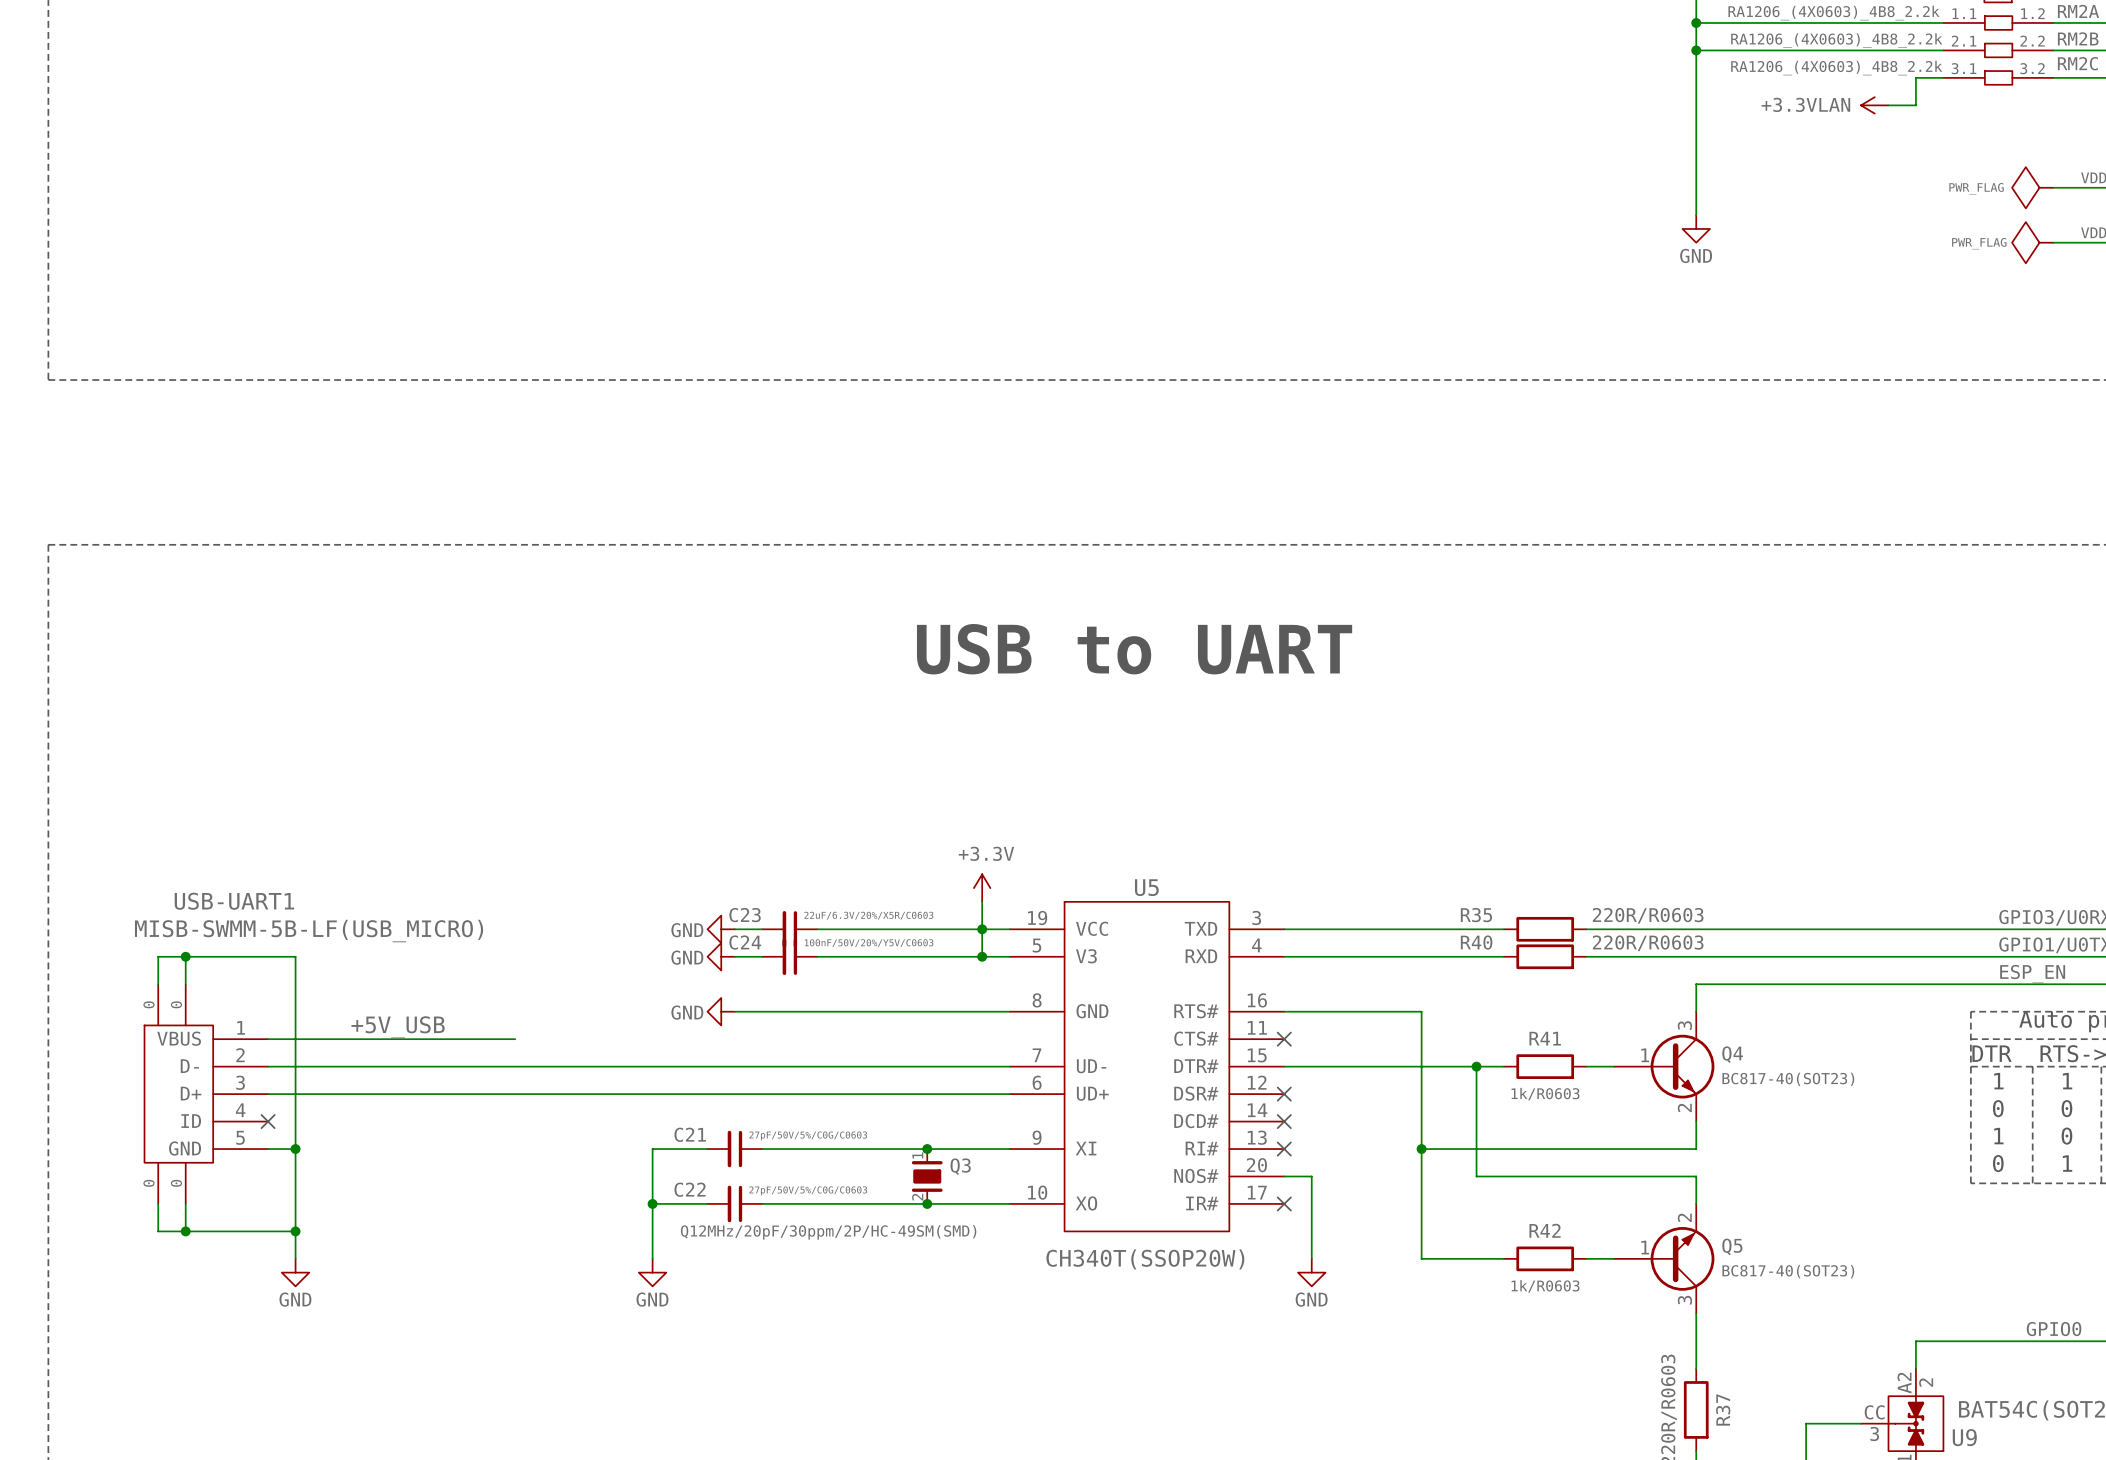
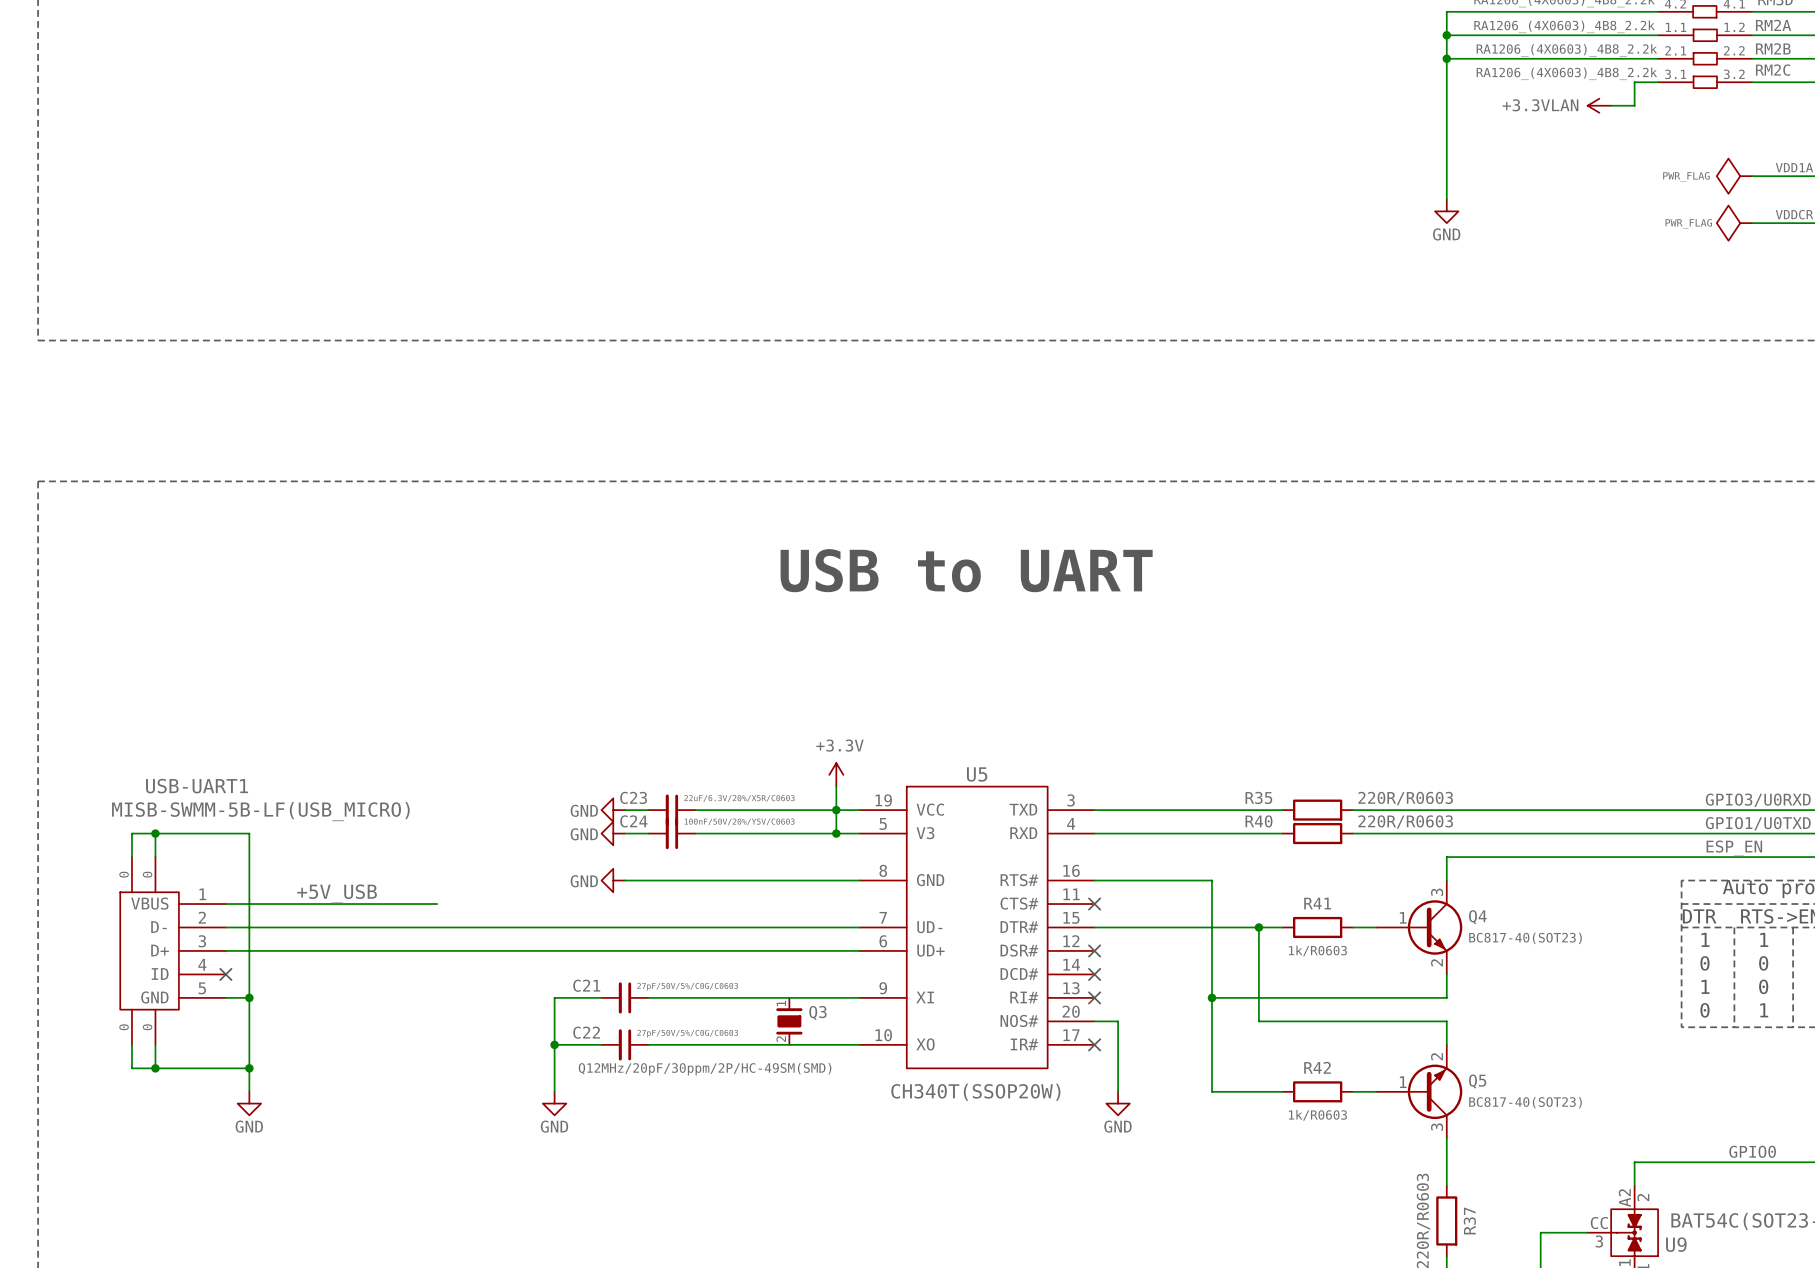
junction: (927, 1149) -> none
junction: (927, 1203) -> none

